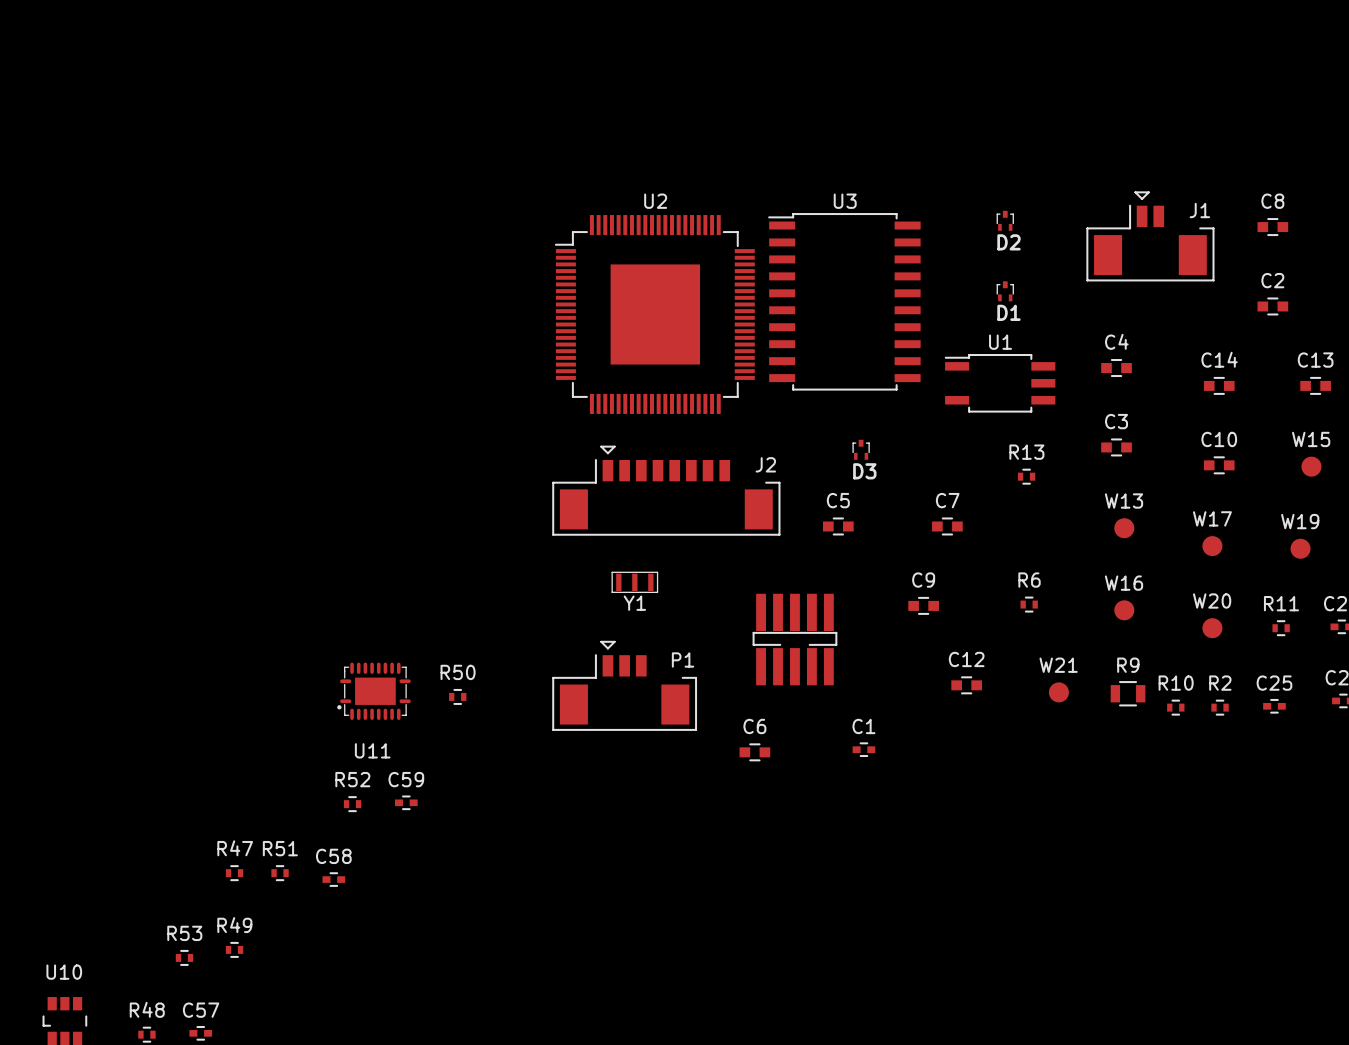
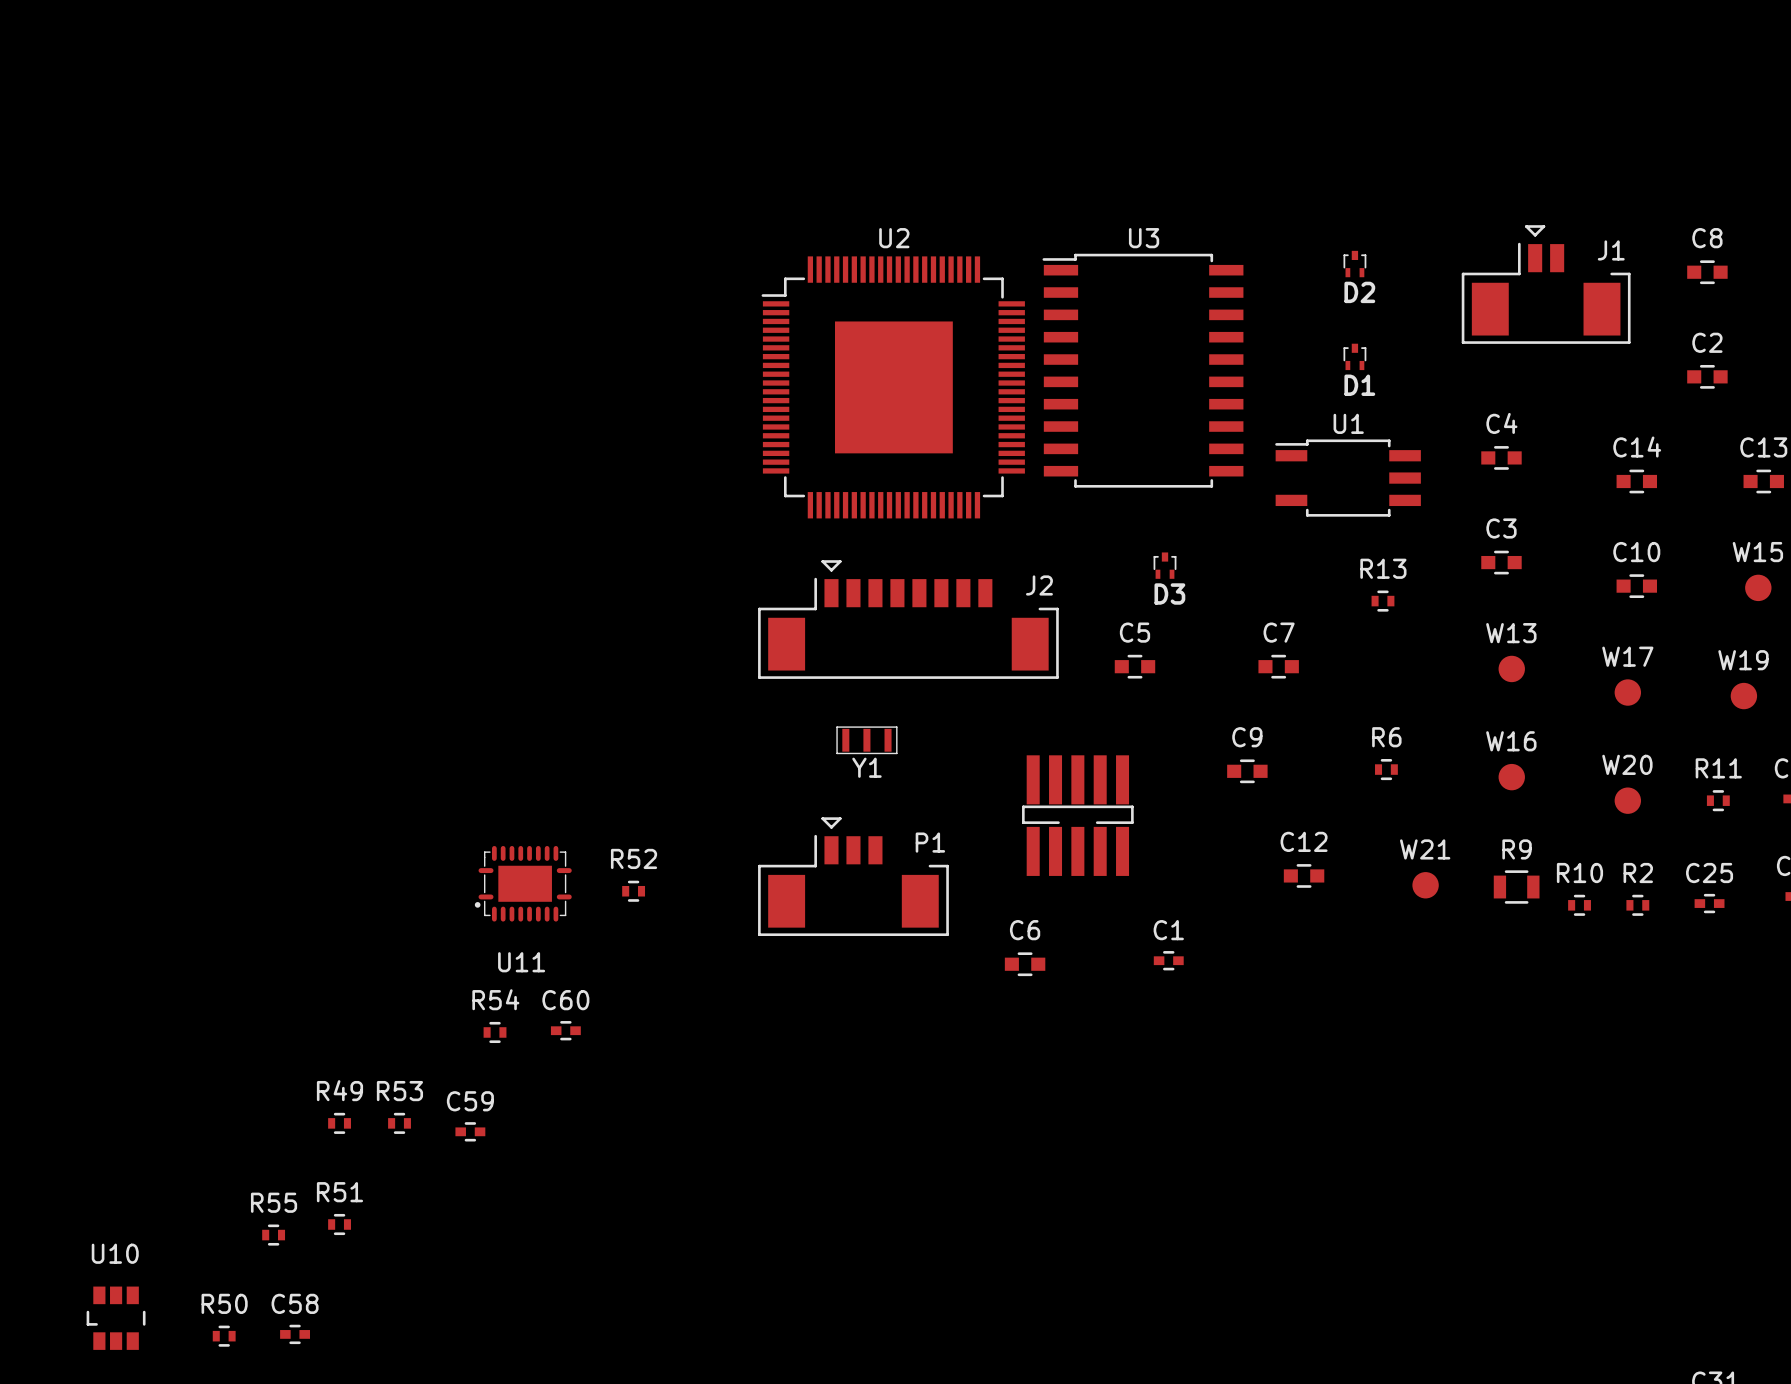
R50 name: R50 (458, 672) -> R52 (634, 858)
R52 name: R52 (352, 779) -> R54 (495, 999)
C59 name: C59 (406, 779) -> C60 (565, 1000)
R47 name: R47 (235, 848) -> R49 (339, 1090)
R51 name: R51 (280, 848) -> R53 (399, 1091)
C58 name: C58 (333, 856) -> C59 (470, 1101)
R49 name: R49 (234, 925) -> R51 (339, 1192)
R53 name: R53 (184, 933) -> R55 (274, 1202)
R48 name: R48 (147, 1009) -> R50 (224, 1303)
C57 name: C57 (201, 1010) -> C58 (295, 1303)

